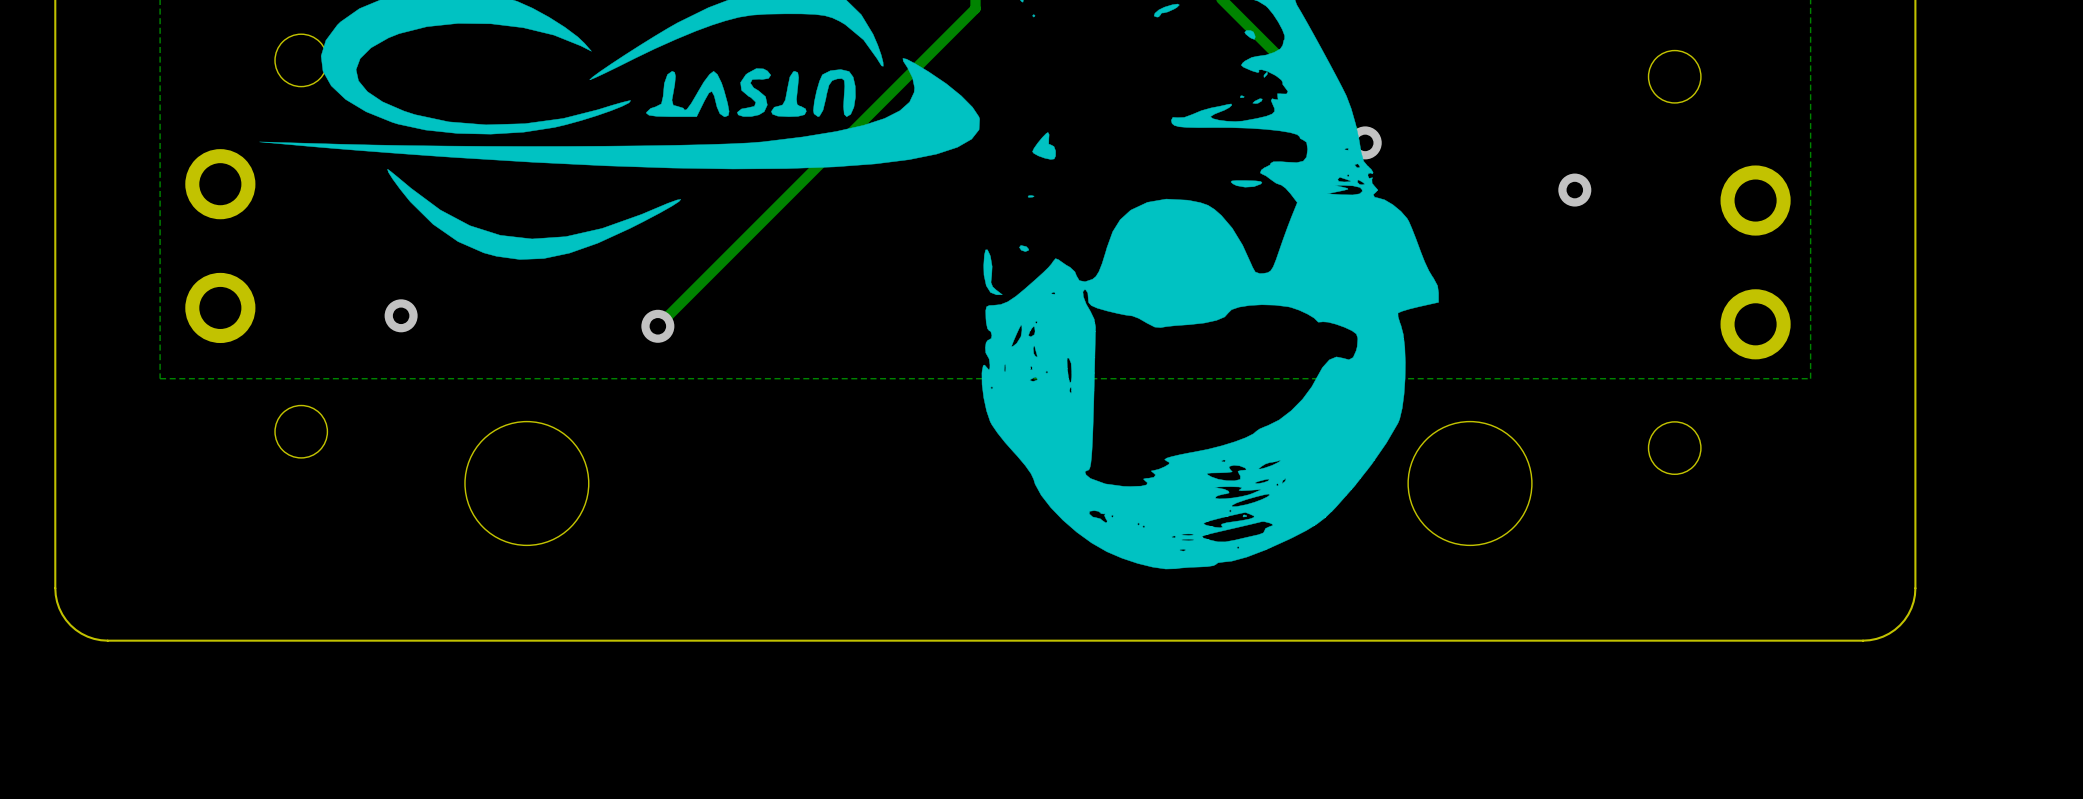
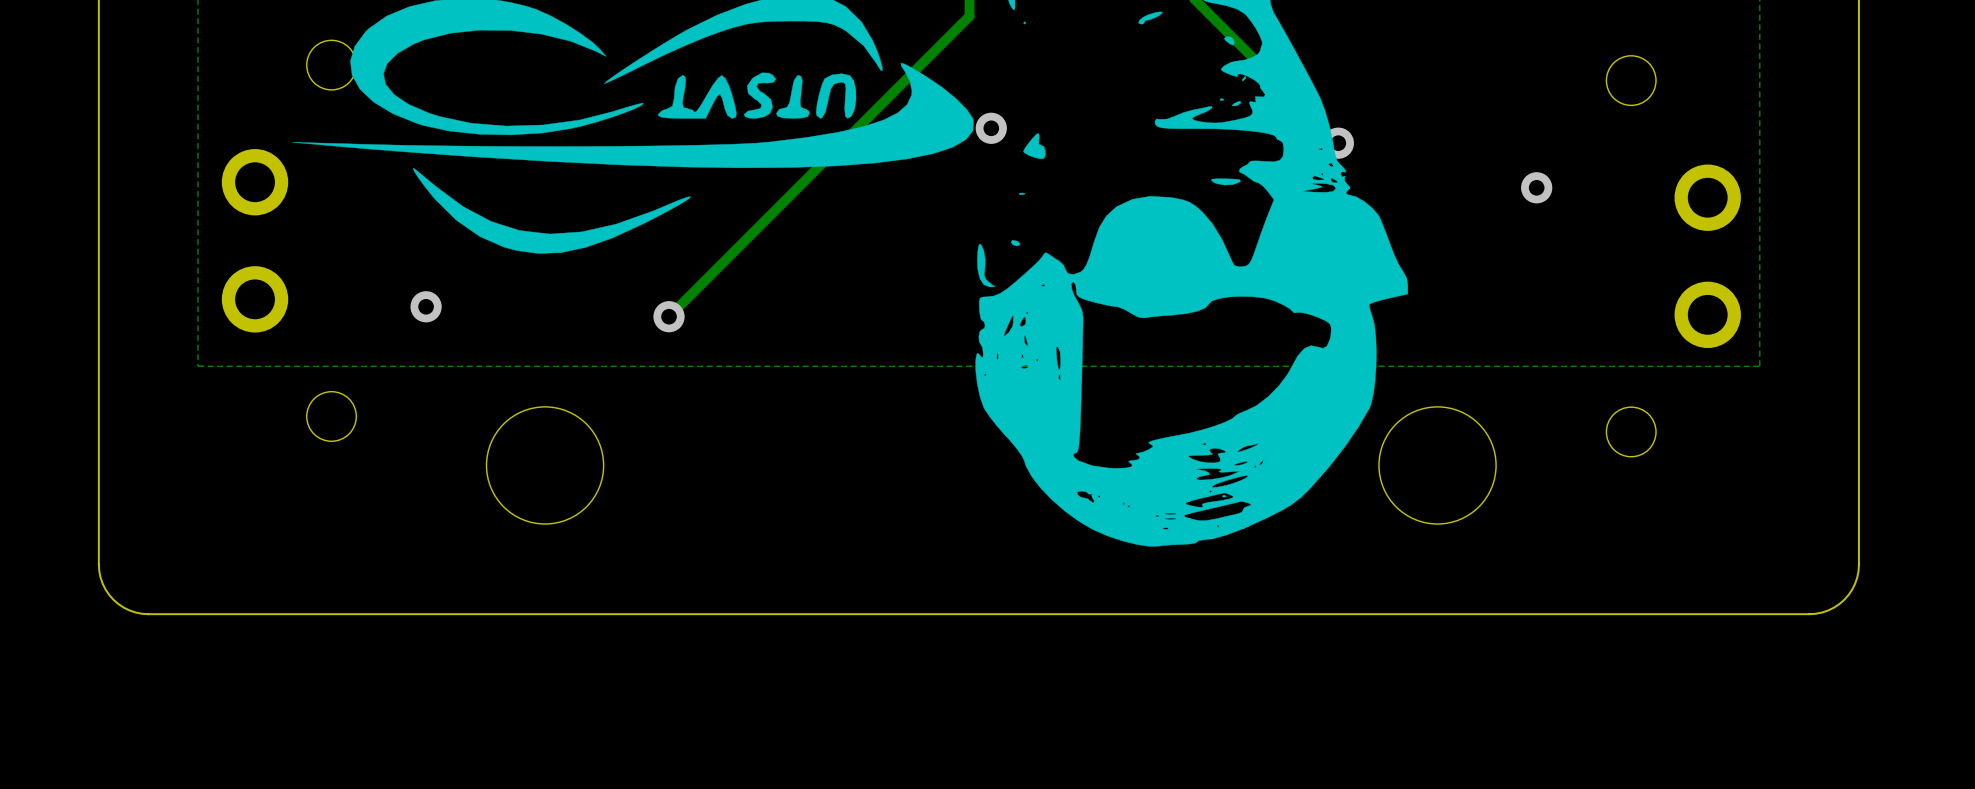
via: none -> (991, 128)

